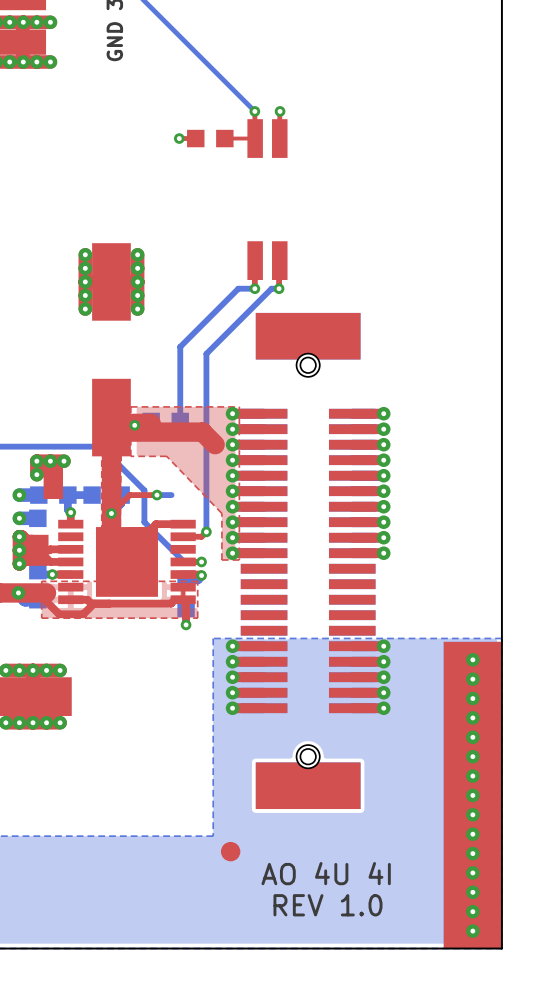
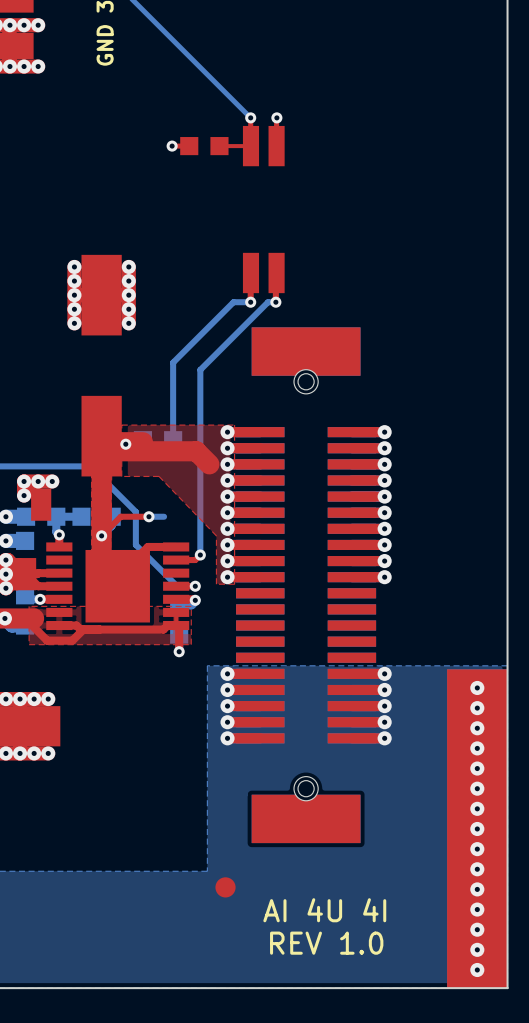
text: AO 4U 4I (326, 873) -> AI 4U 4I (324, 910)

